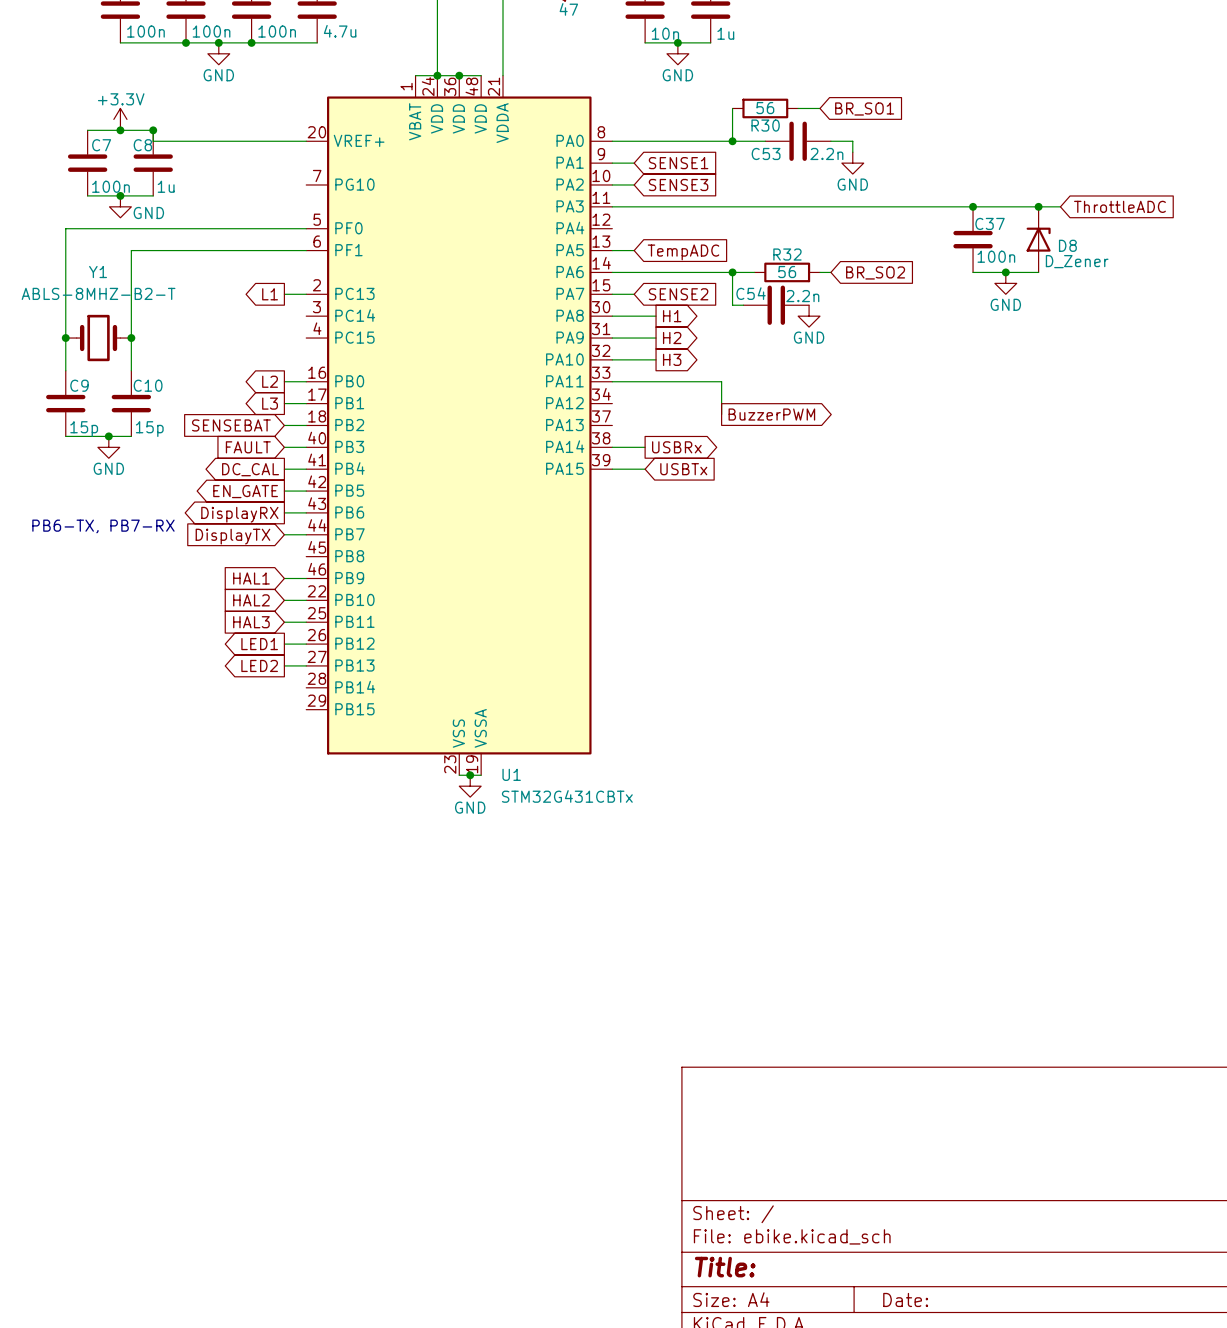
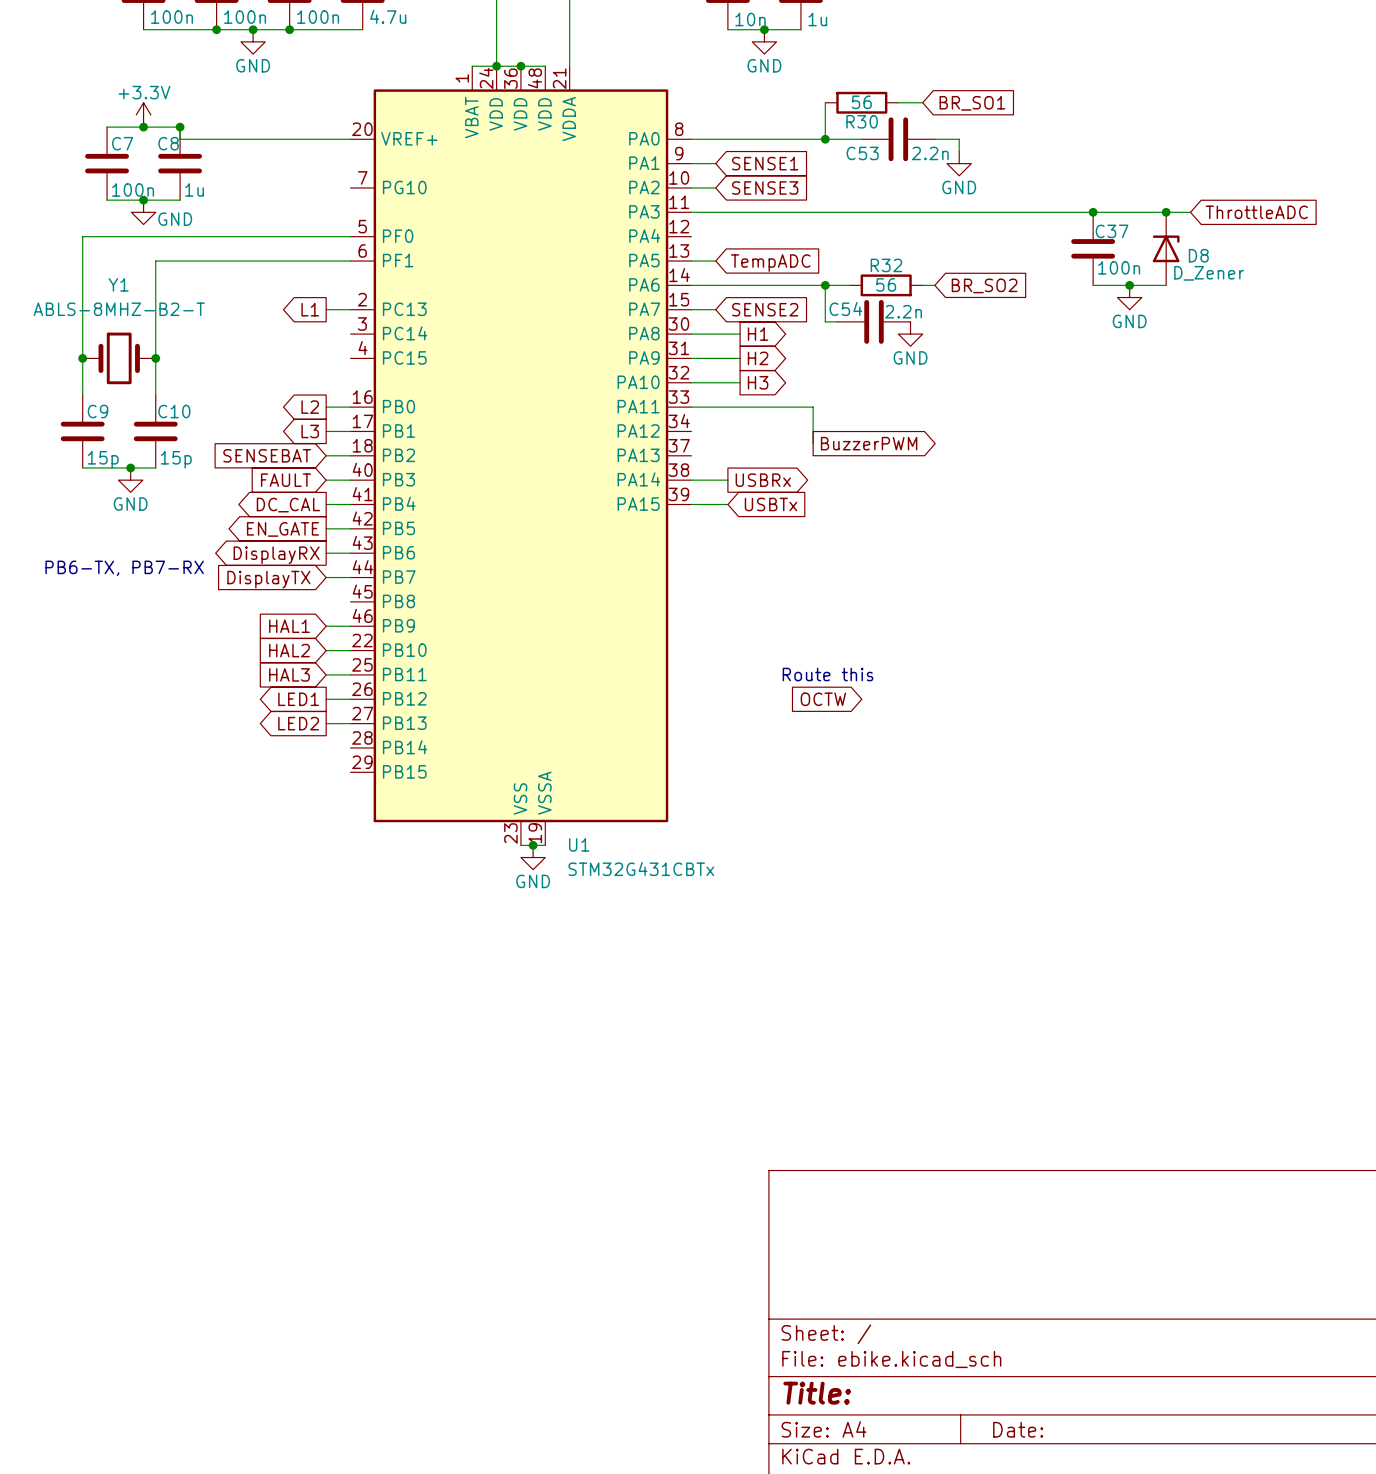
text: none -> Route this (828, 674)
global label: none -> OCTW (823, 699)

